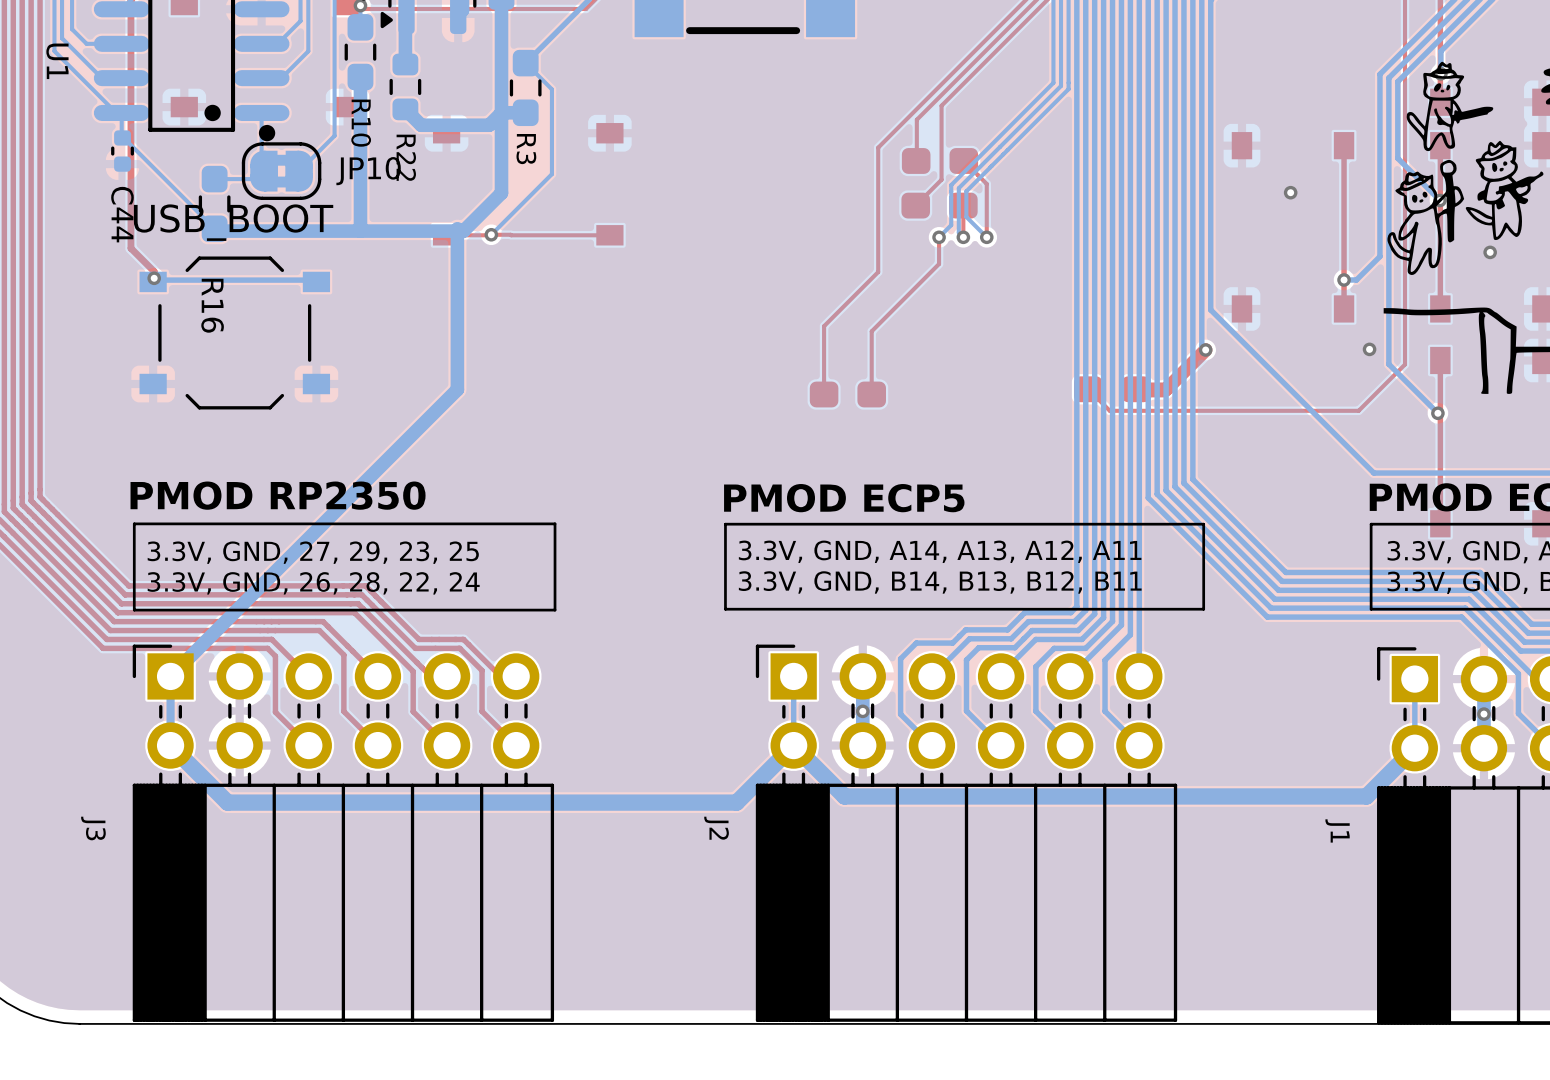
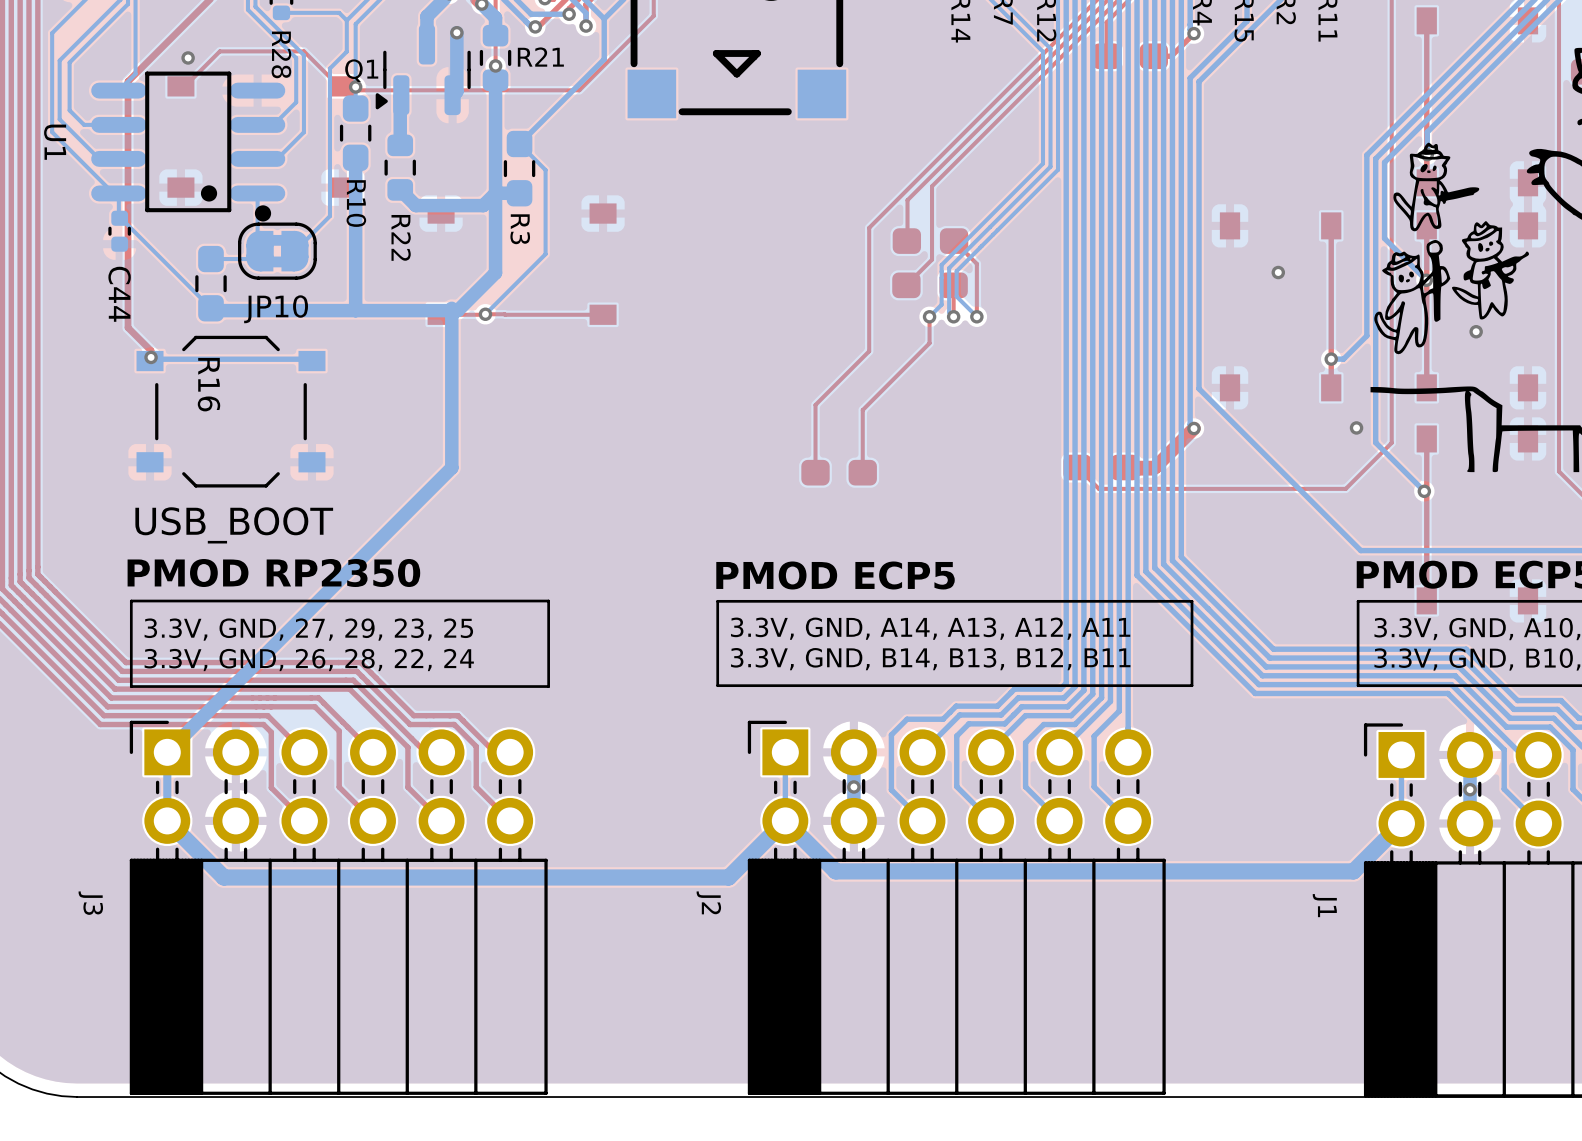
JP10 name position: JP10 (368, 171) -> JP10 (276, 309)
text position: USB_BOOT (233, 222) -> USB_BOOT (234, 525)

